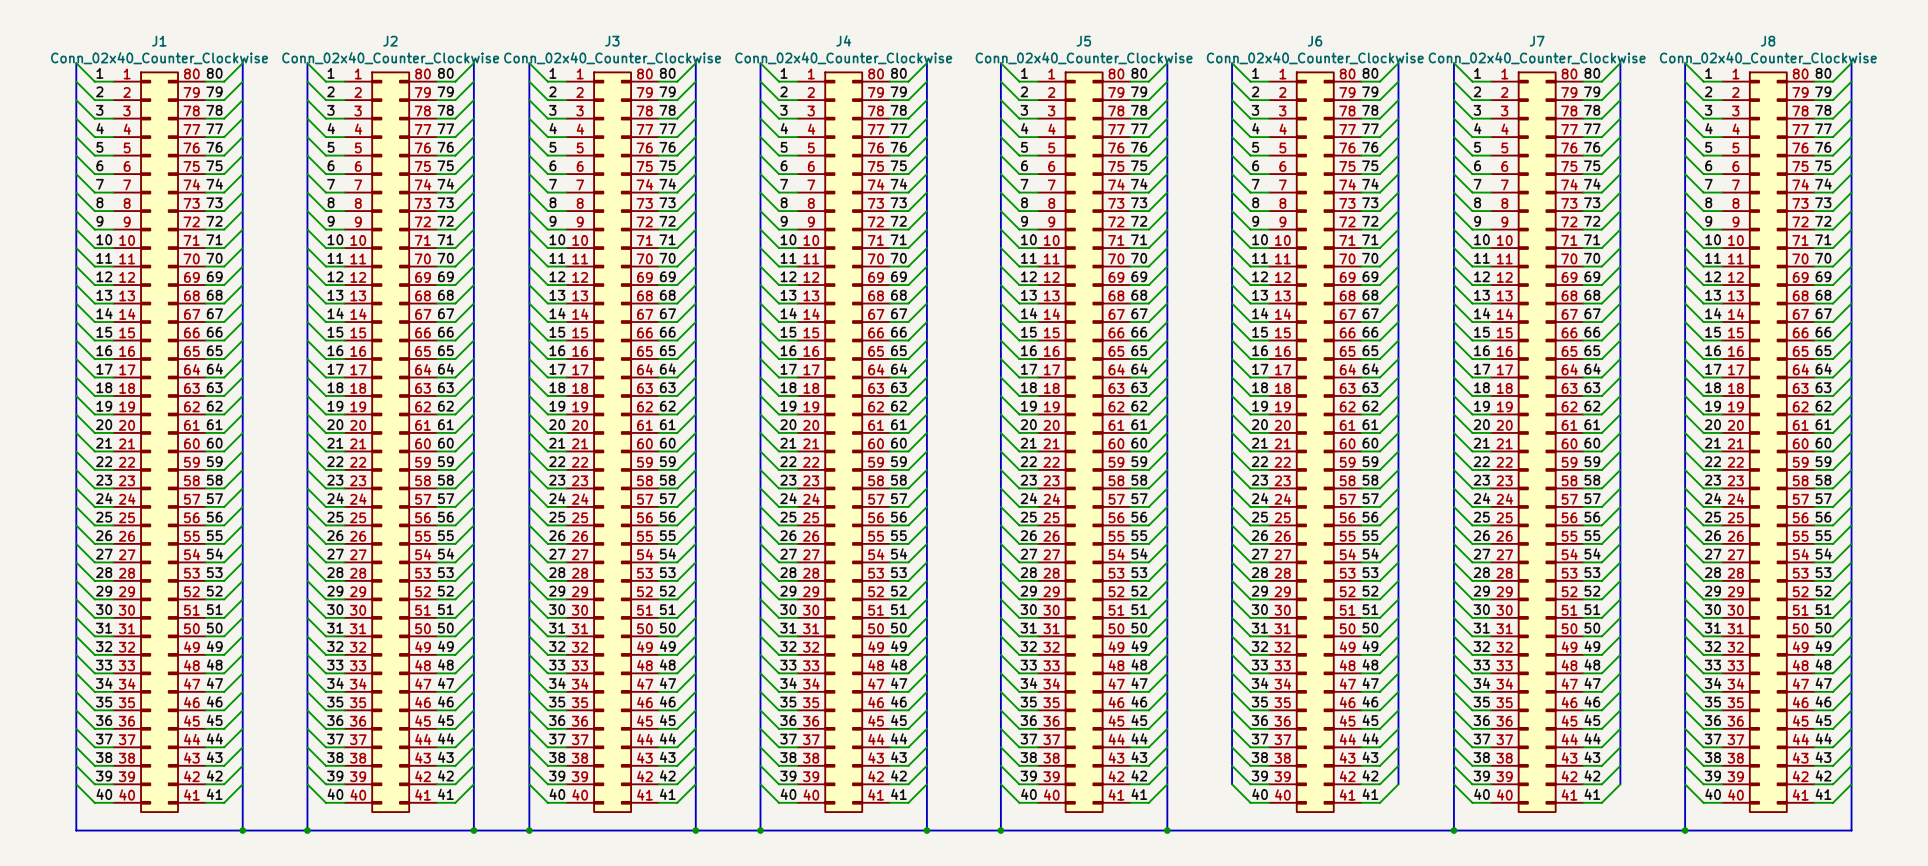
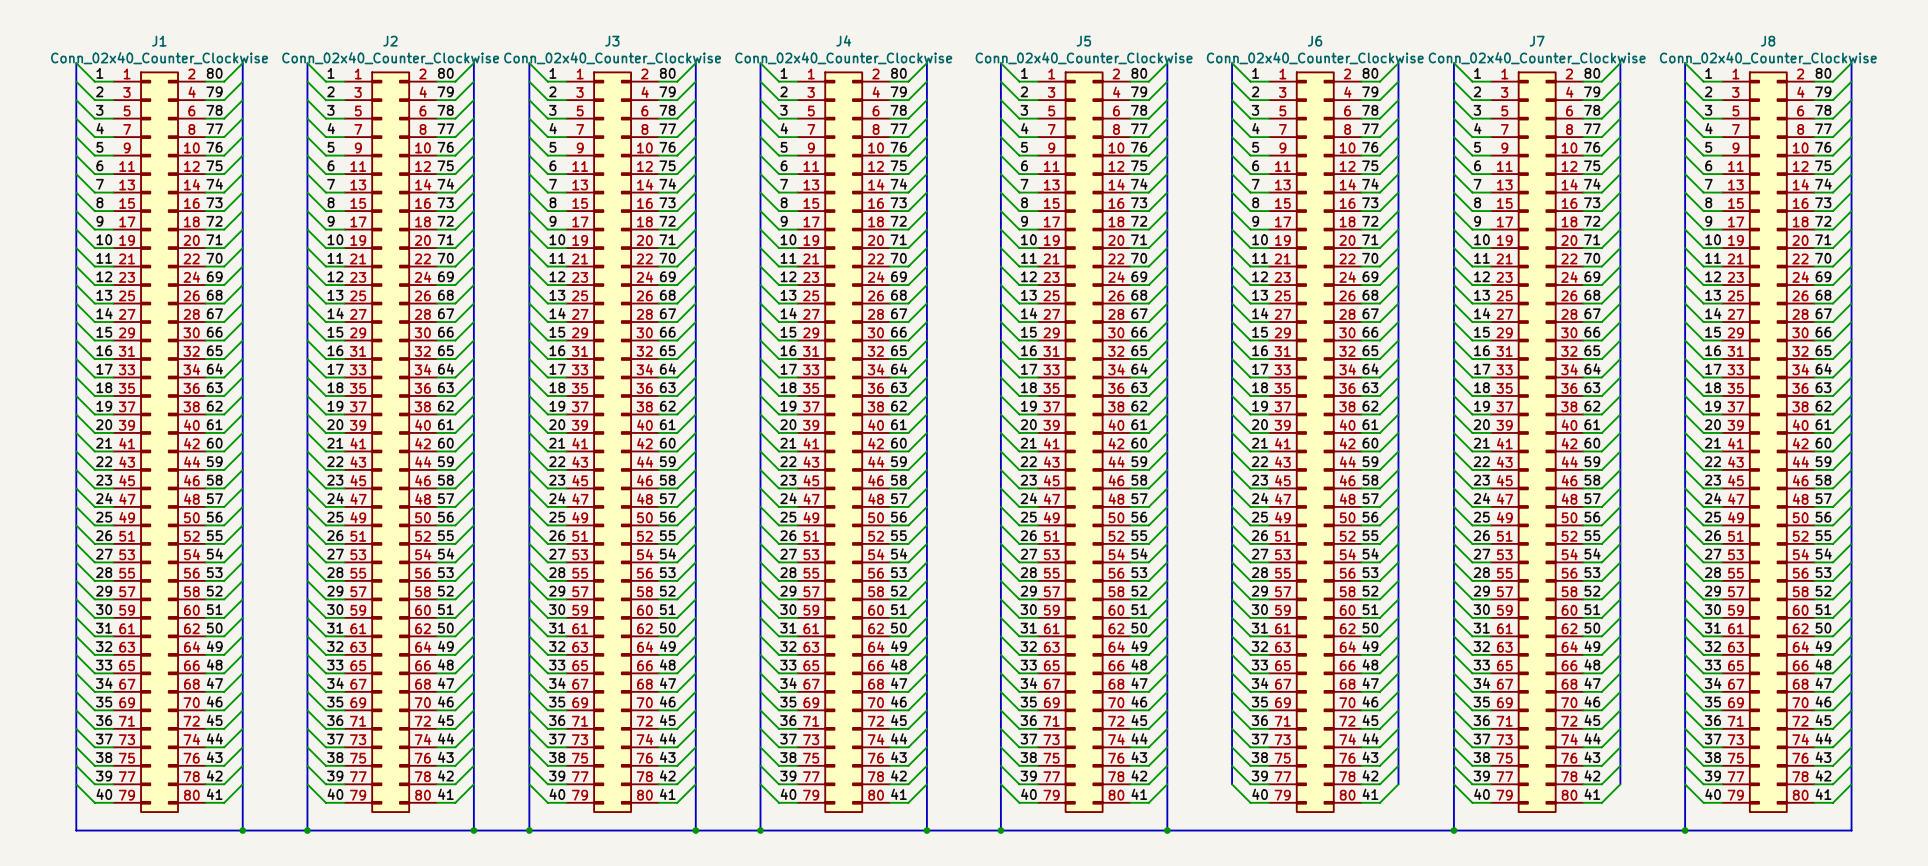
J1 symbol: [113, 71, 206, 813] -> [113, 71, 206, 813]
J2 symbol: [344, 71, 437, 813] -> [344, 71, 437, 813]
J3 symbol: [566, 71, 659, 813] -> [566, 71, 659, 813]
J4 symbol: [797, 71, 890, 813] -> [797, 71, 890, 813]
J5 symbol: [1037, 71, 1131, 813] -> [1037, 71, 1131, 813]
J6 symbol: [1269, 71, 1362, 813] -> [1269, 71, 1362, 813]
J7 symbol: [1490, 71, 1584, 813] -> [1490, 71, 1584, 813]
J8 symbol: [1722, 71, 1815, 813] -> [1722, 71, 1815, 813]

